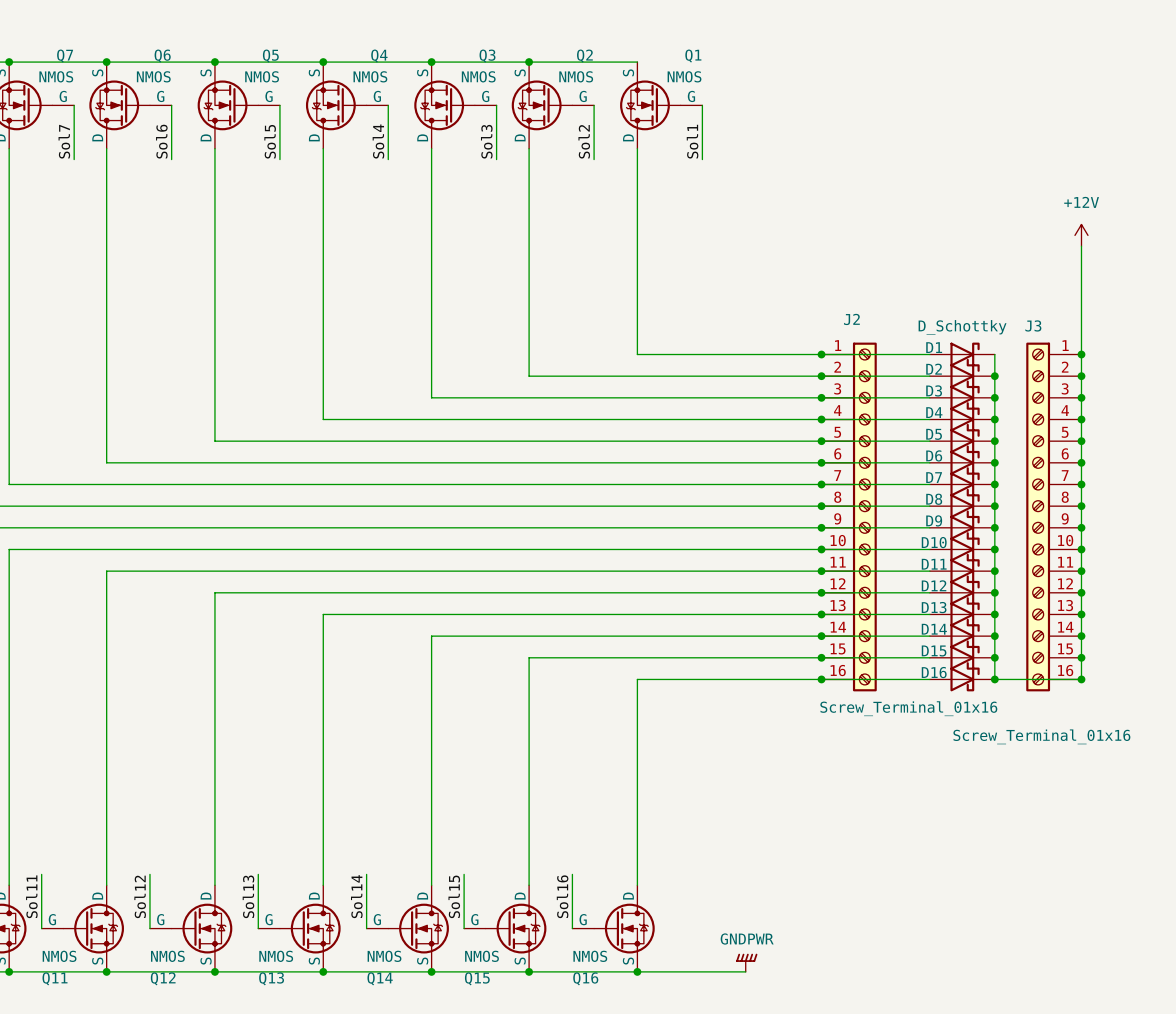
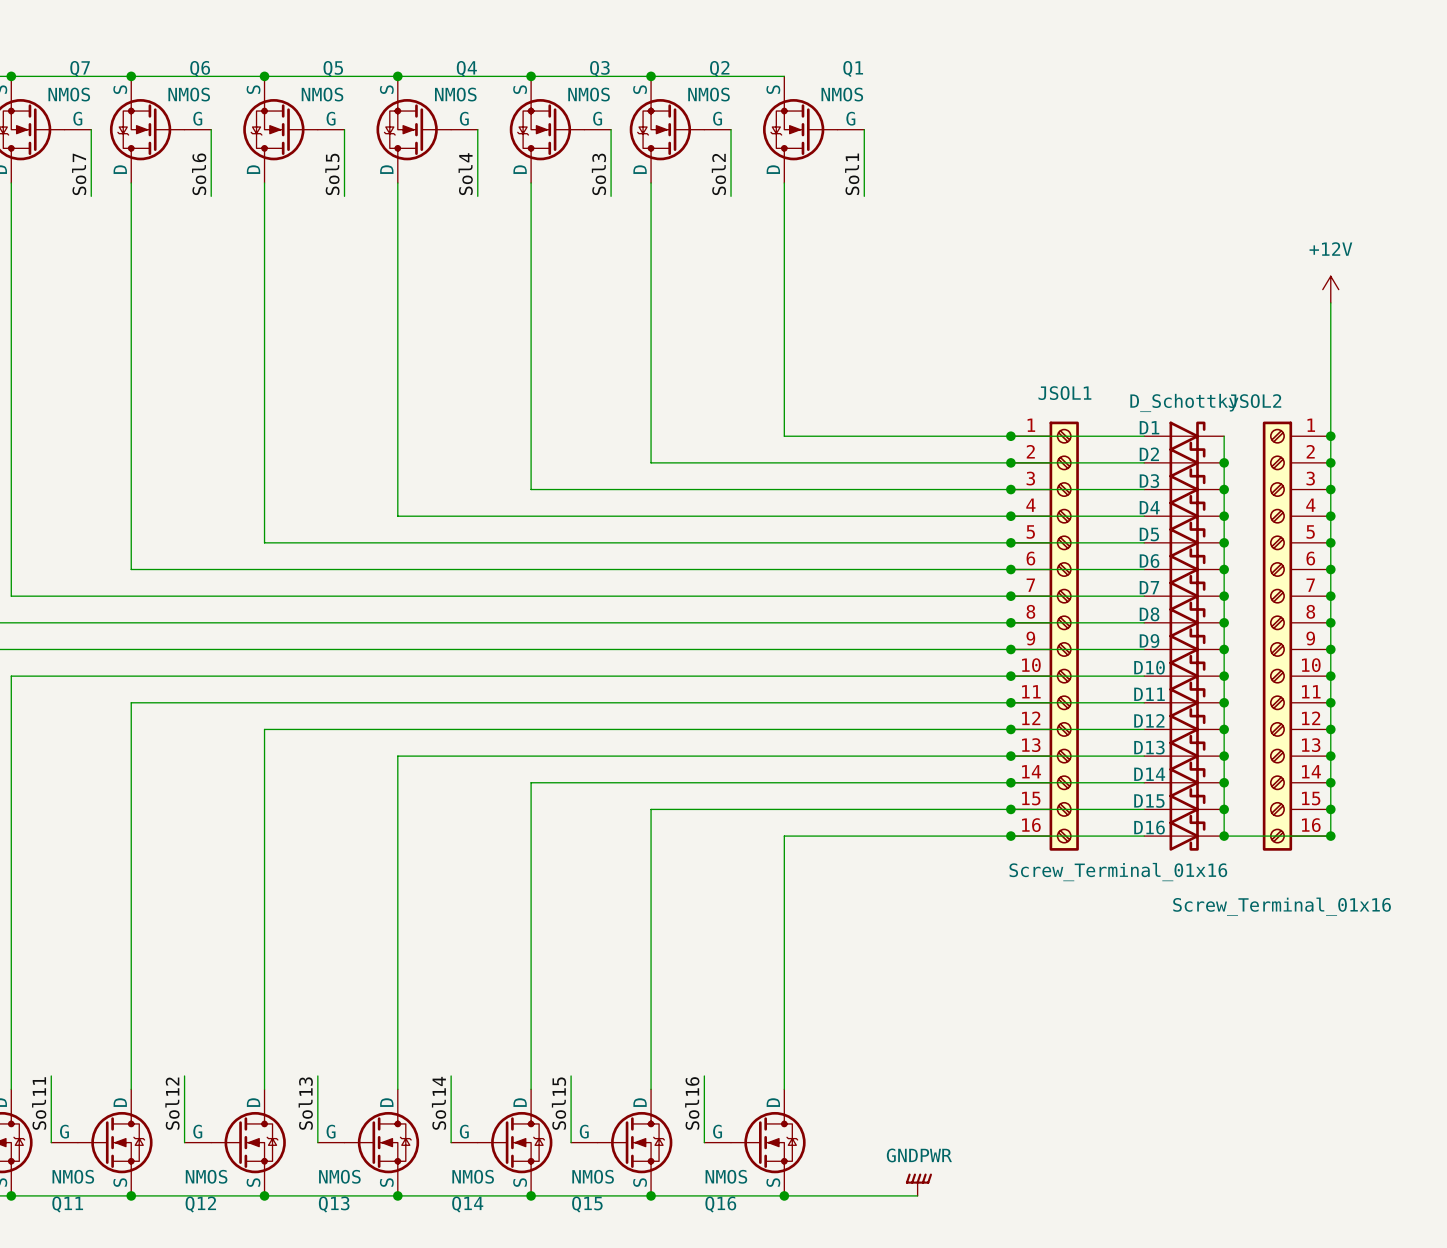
J2 name: J2 (851, 319) -> JSOL1 (1064, 393)
J3 name: J3 (1033, 325) -> JSOL2 (1254, 401)

